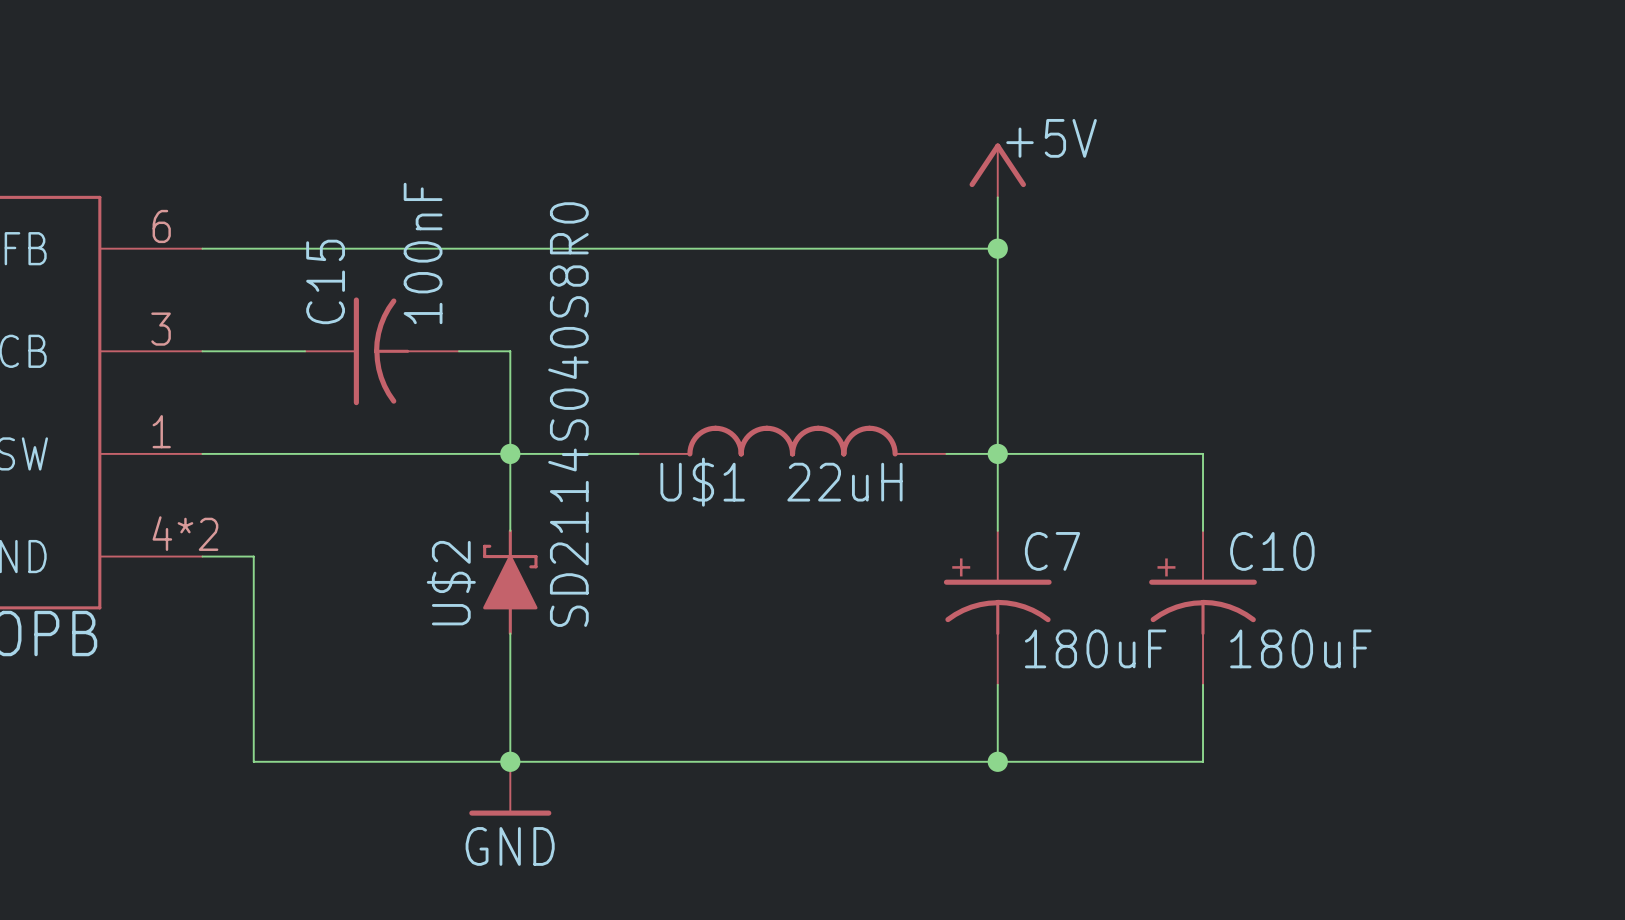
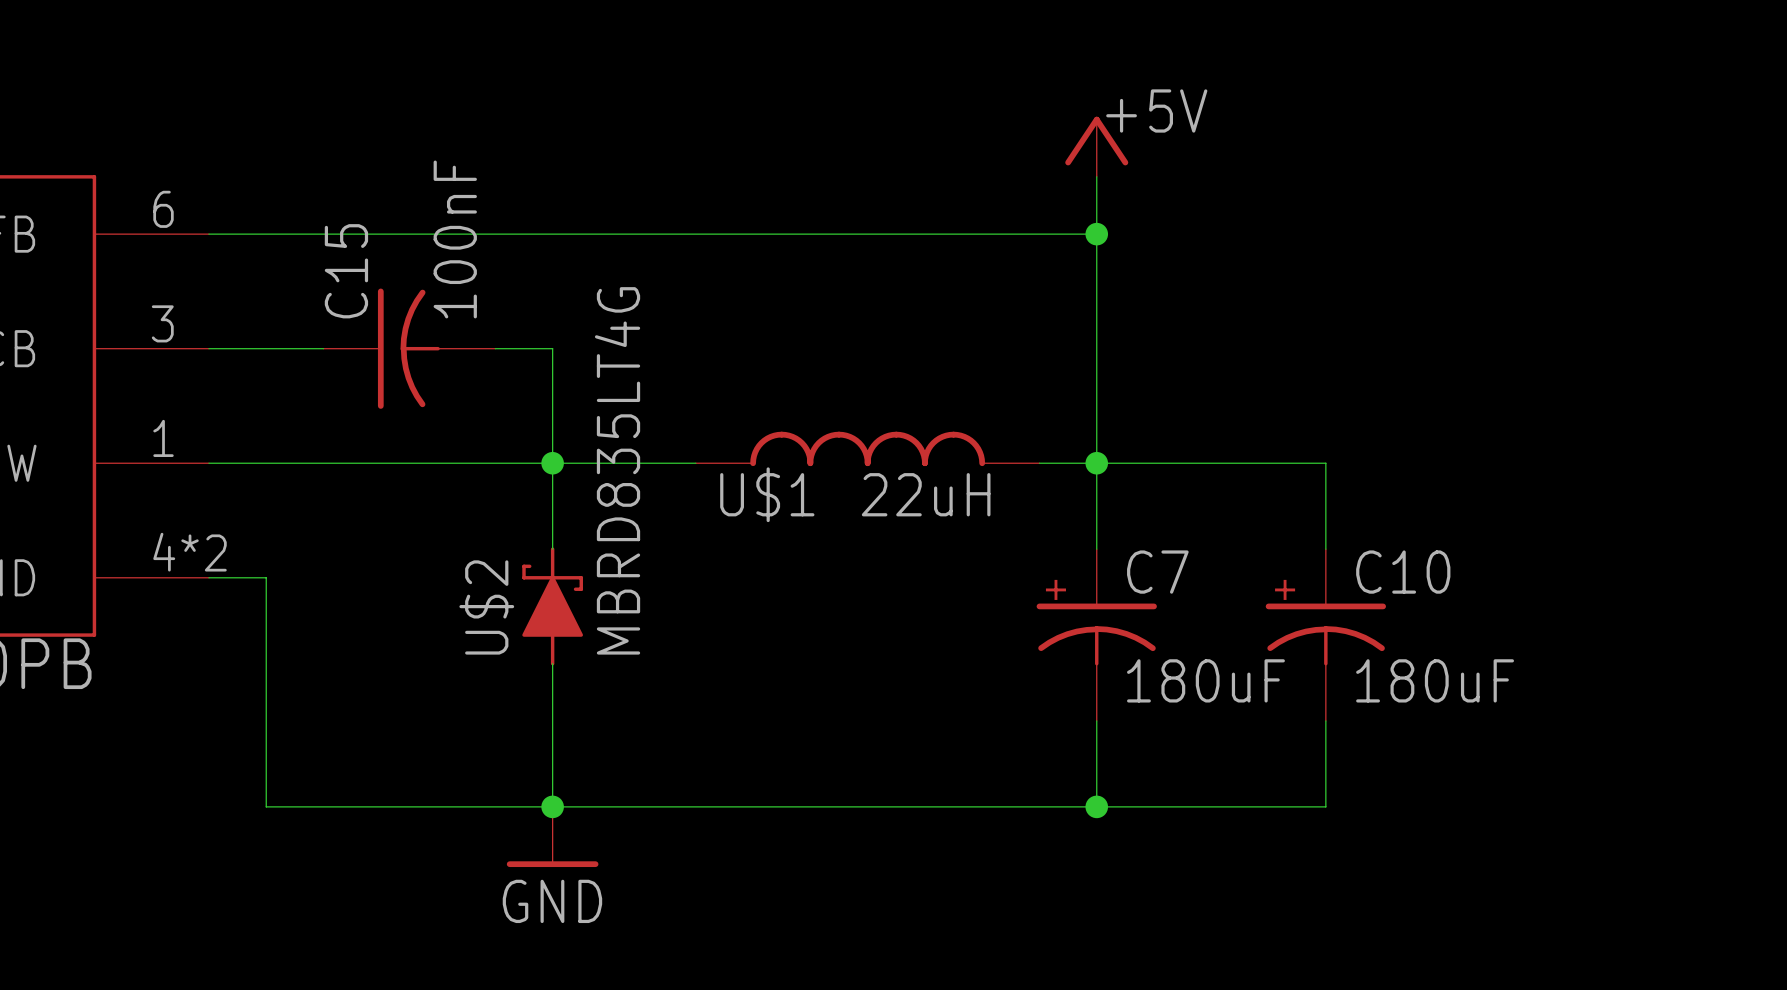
U$2 value: SD2114S040S8R0 (568, 414) -> MBRD835LT4G (617, 470)

